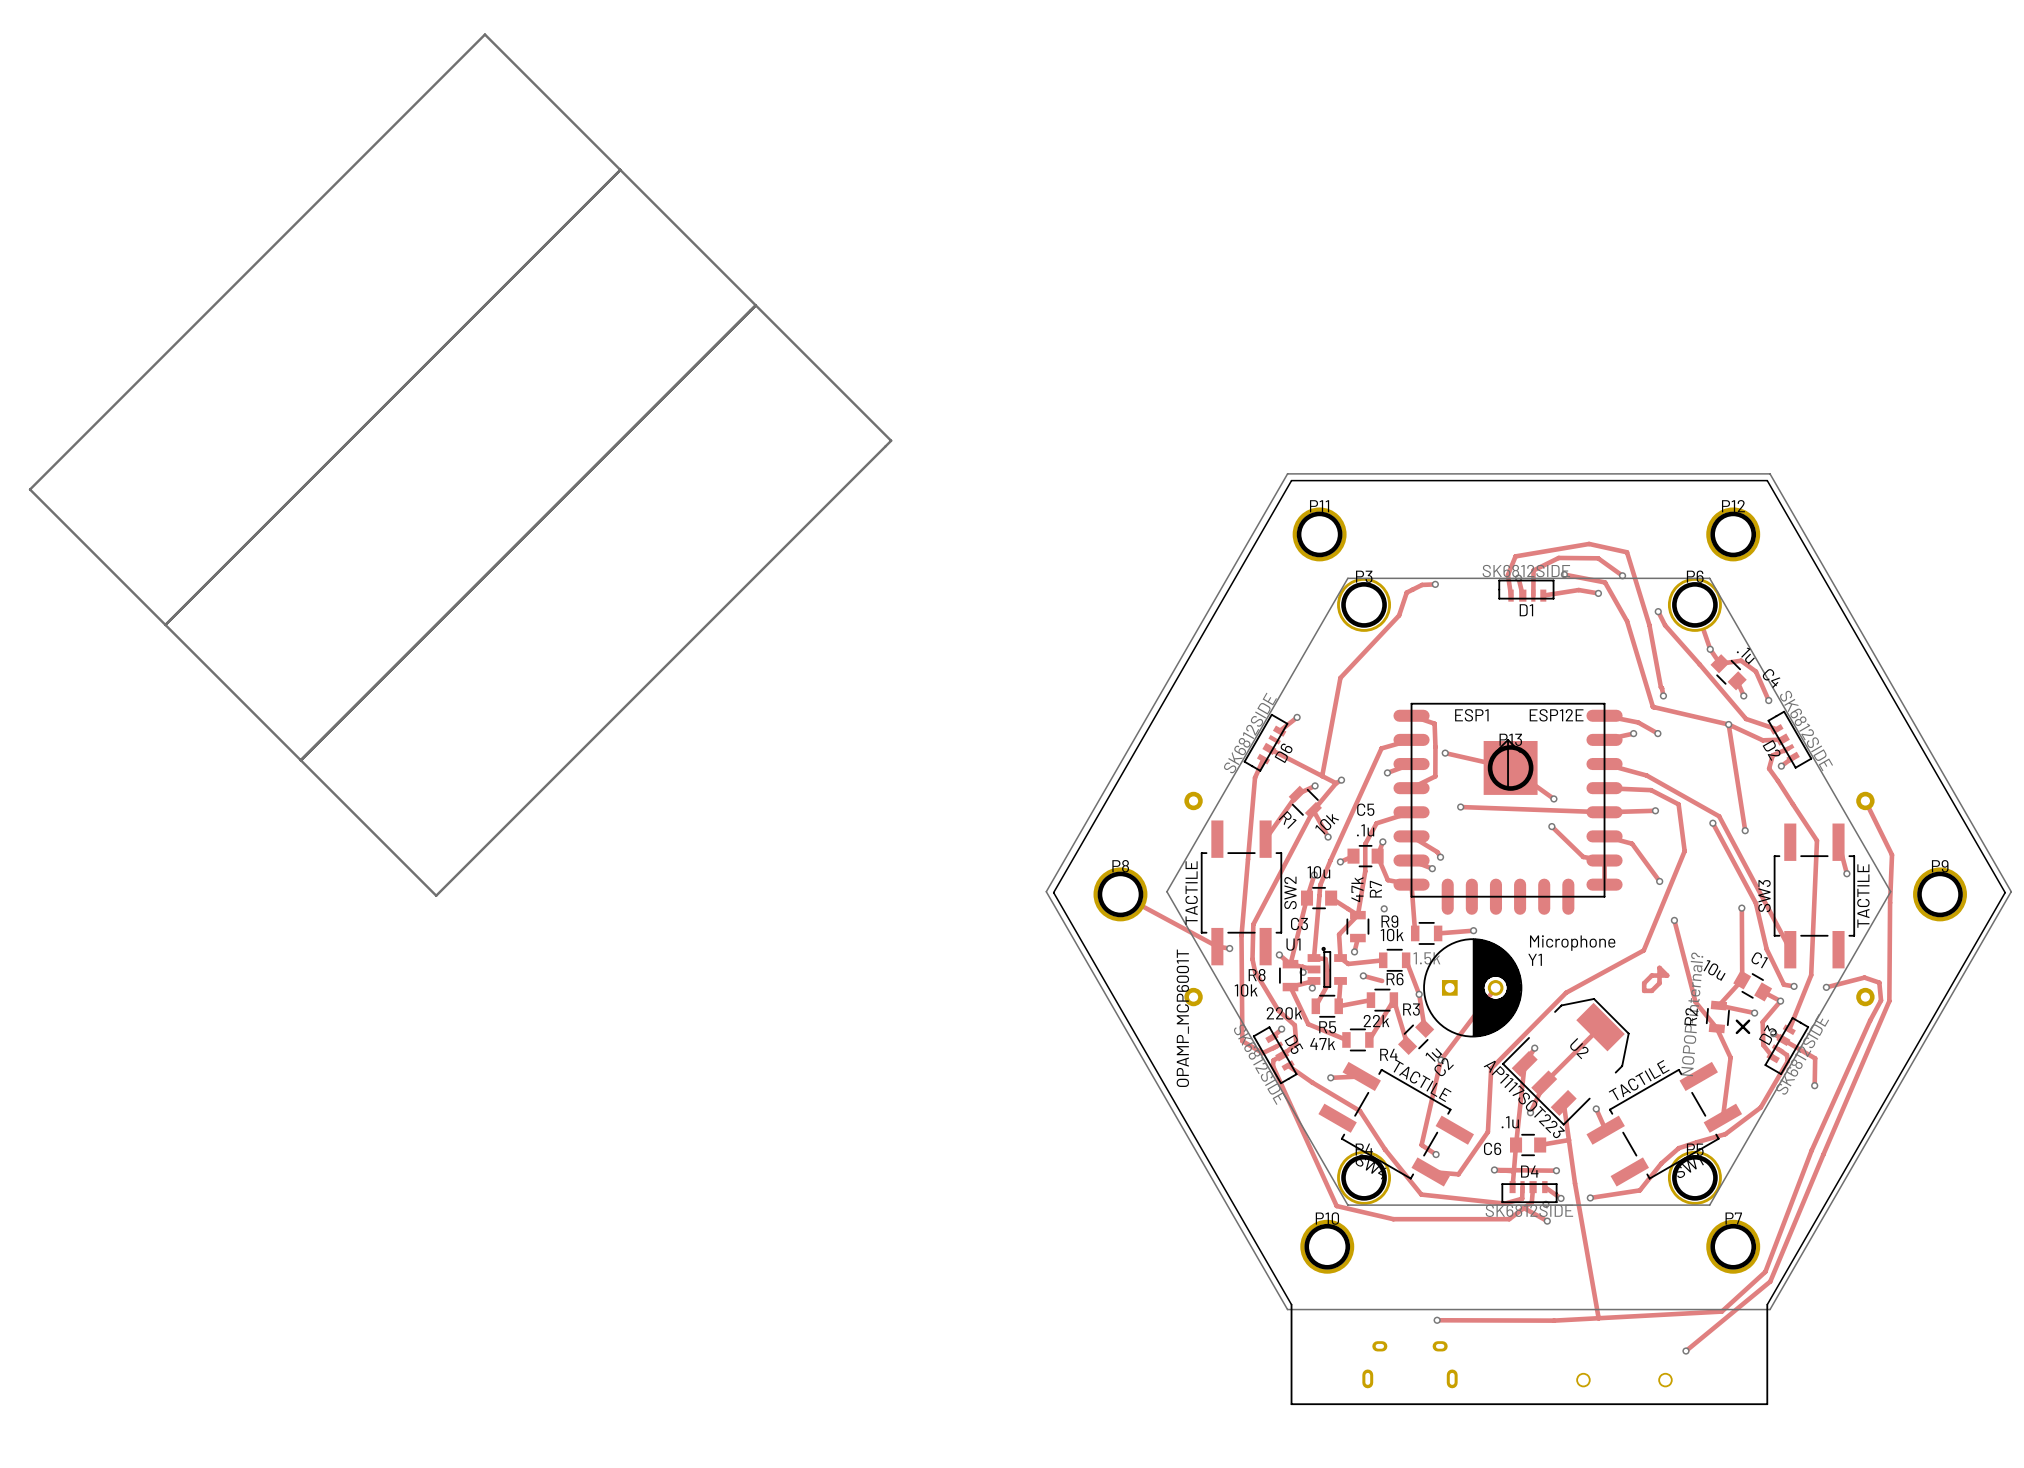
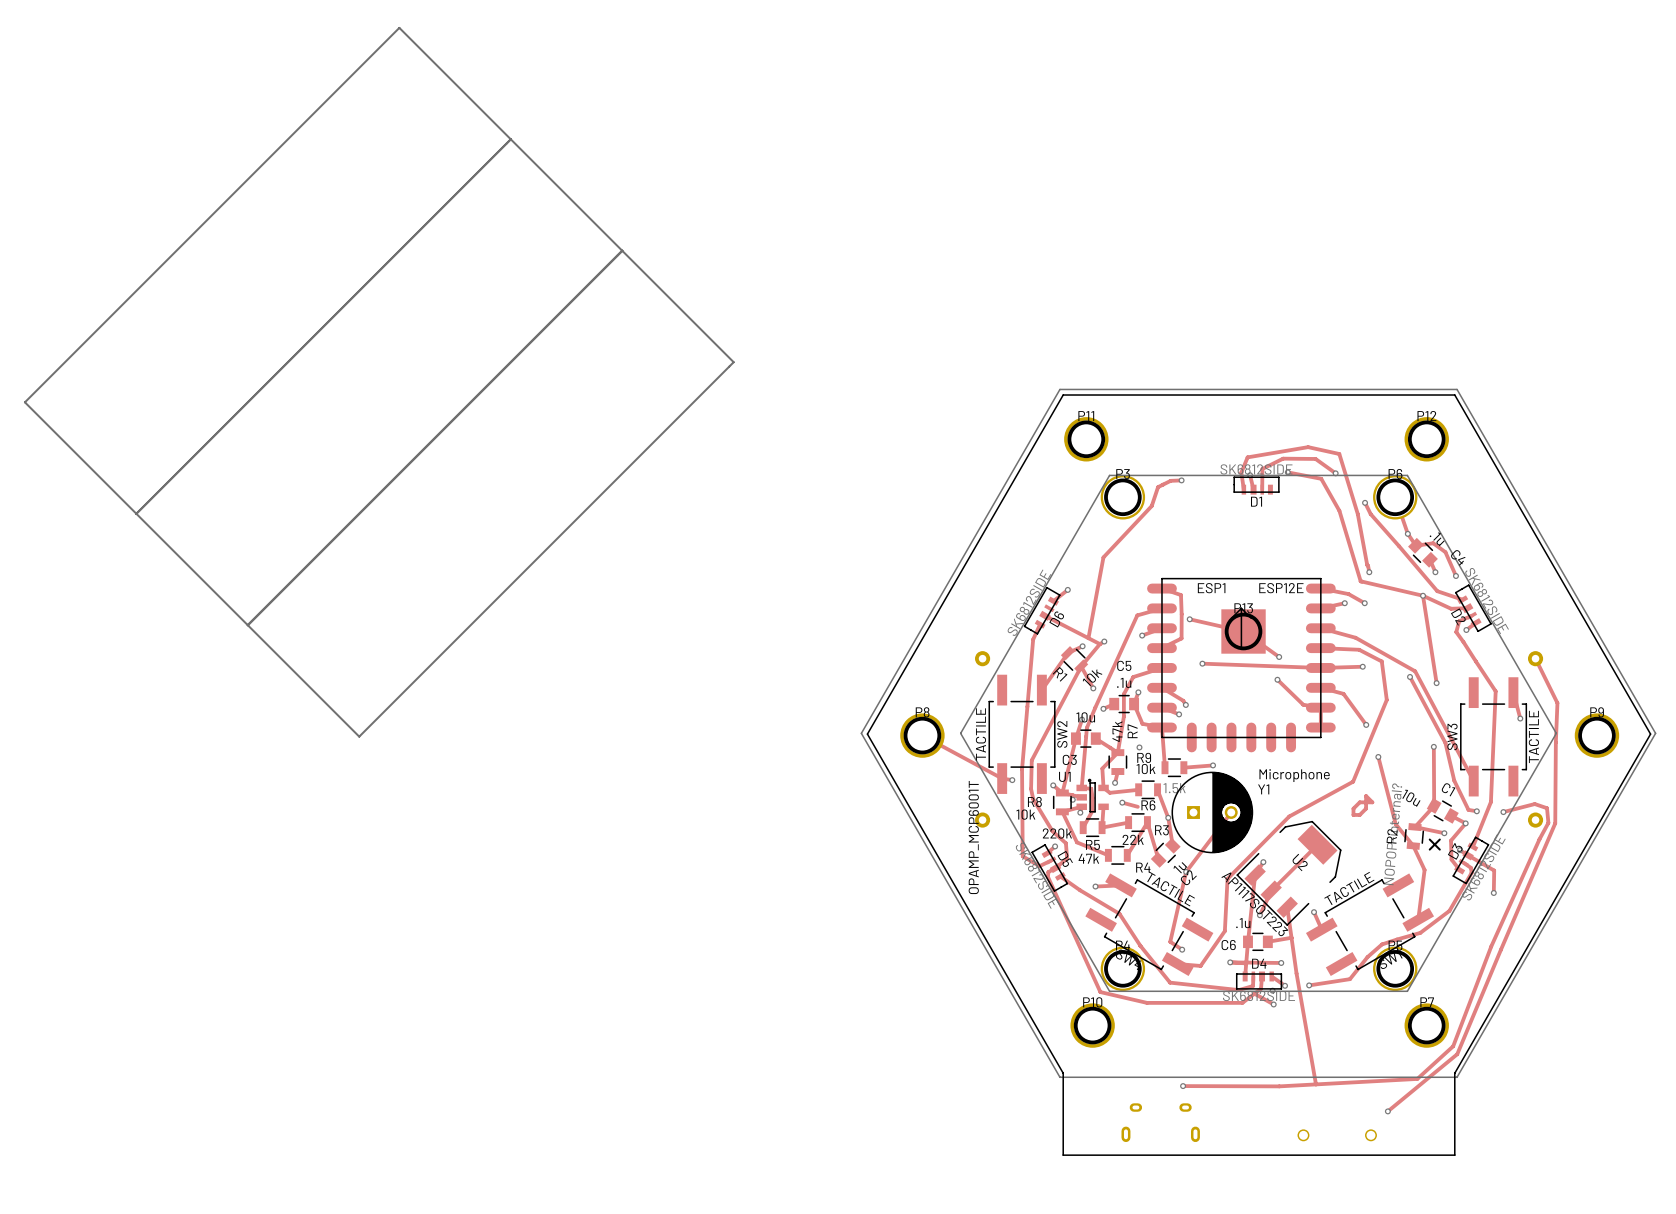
track: (1598, 593) (1578, 590) (1543, 595) -> none
via: (1598, 593) -> none

